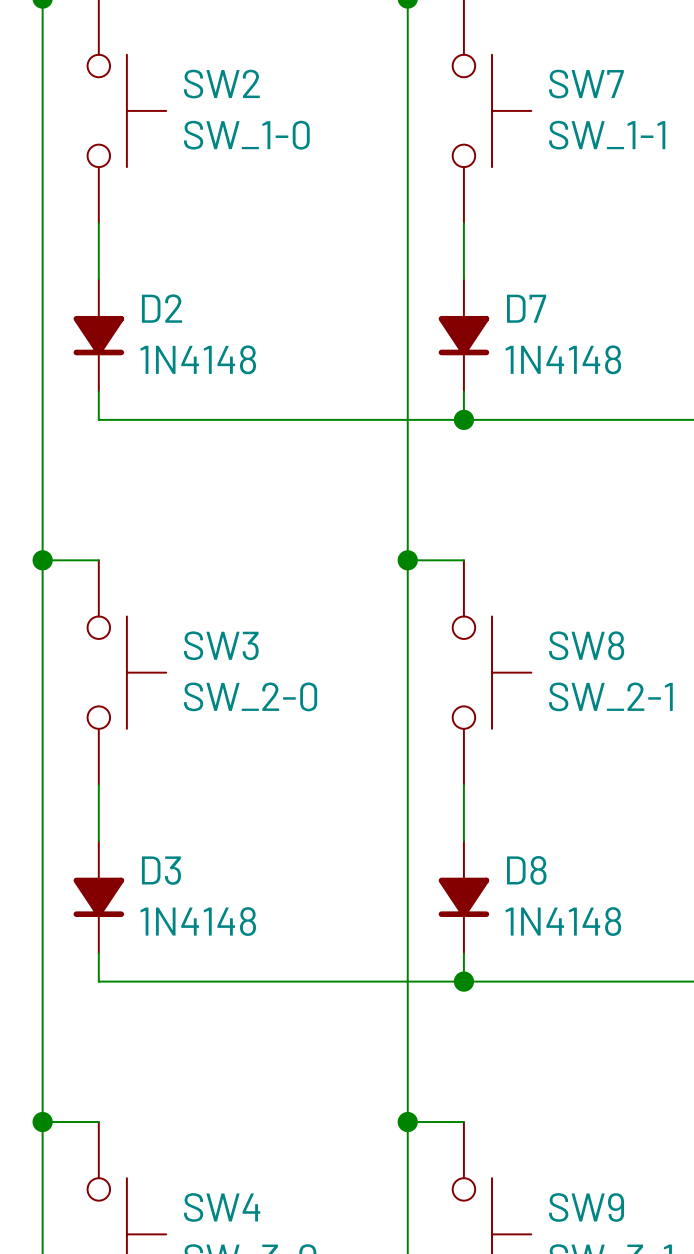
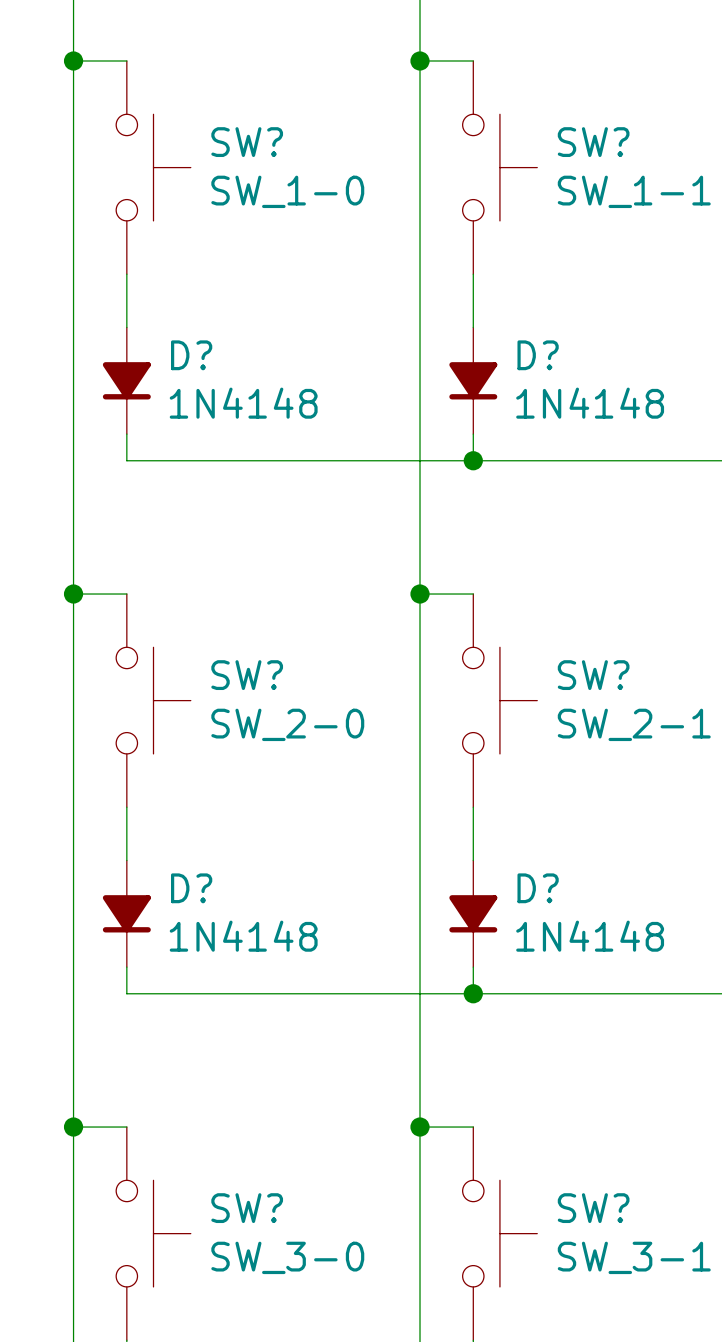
SW2 name: SW2 (221, 84) -> SW? (247, 142)
SW7 name: SW7 (586, 84) -> SW? (593, 142)
D2 name: D2 (162, 308) -> D? (191, 355)
D7 name: D7 (526, 308) -> D? (538, 355)
SW3 name: SW3 (221, 645) -> SW? (247, 675)
SW8 name: SW8 (586, 645) -> SW? (593, 675)
D3 name: D3 (161, 870) -> D? (191, 888)
D8 name: D8 (526, 870) -> D? (538, 888)
SW4 name: SW4 (222, 1207) -> SW? (247, 1208)
SW9 name: SW9 (586, 1207) -> SW? (593, 1208)

